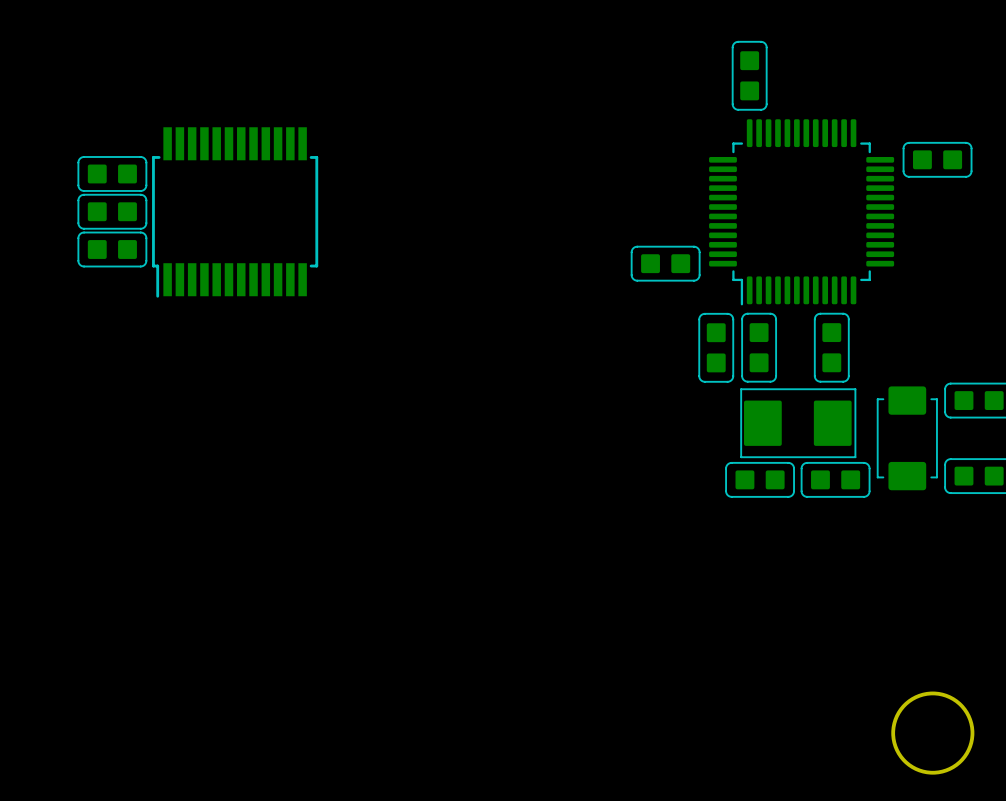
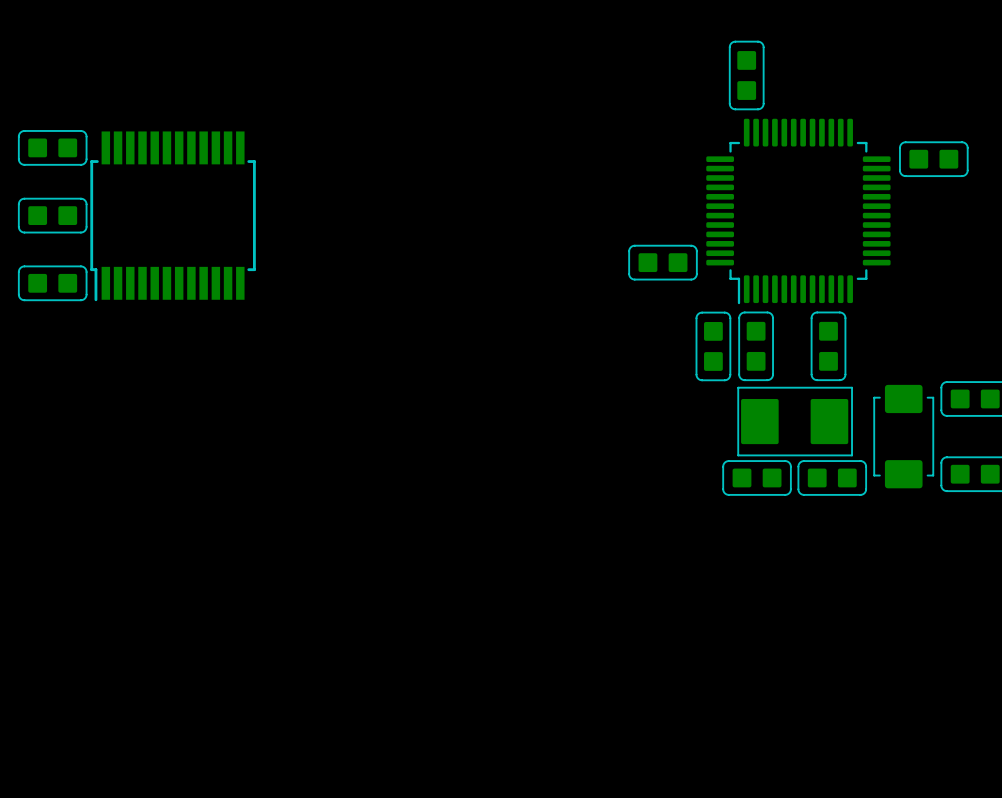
part: none -> (52, 147)
part: (112, 173) -> none
part: (112, 211) -> none
part position: (235, 212) -> (173, 216)
part: none -> (52, 215)
part: (112, 249) -> none
part: none -> (52, 283)
round board edge: [891, 691, 975, 775] -> none

